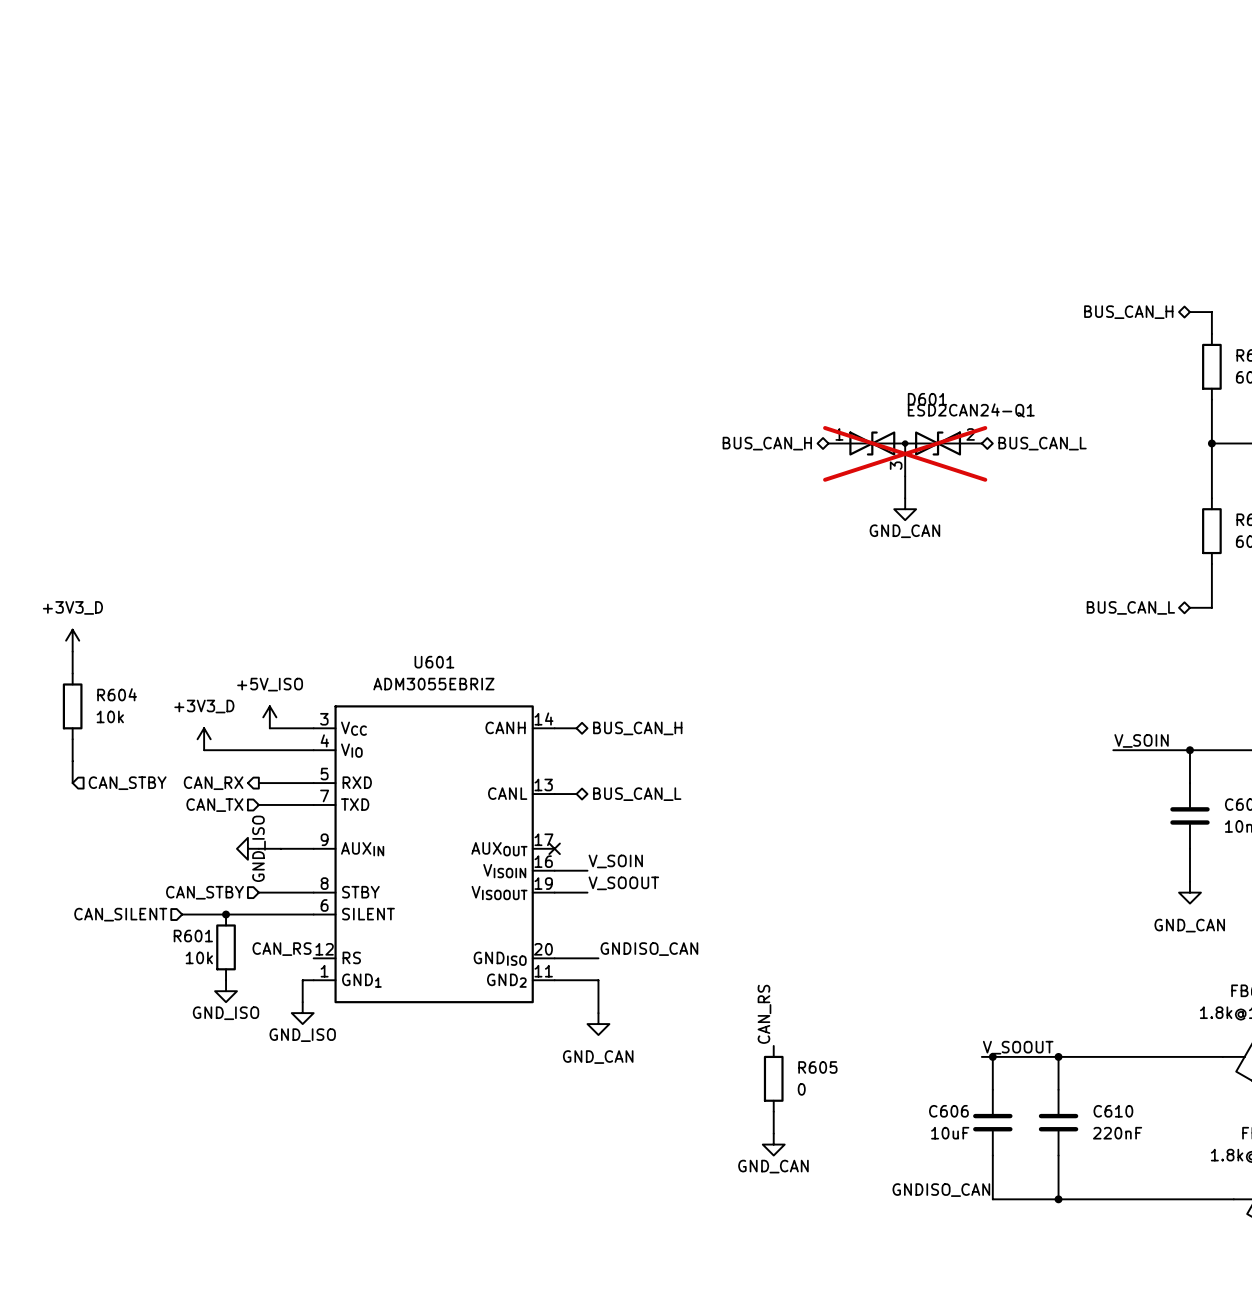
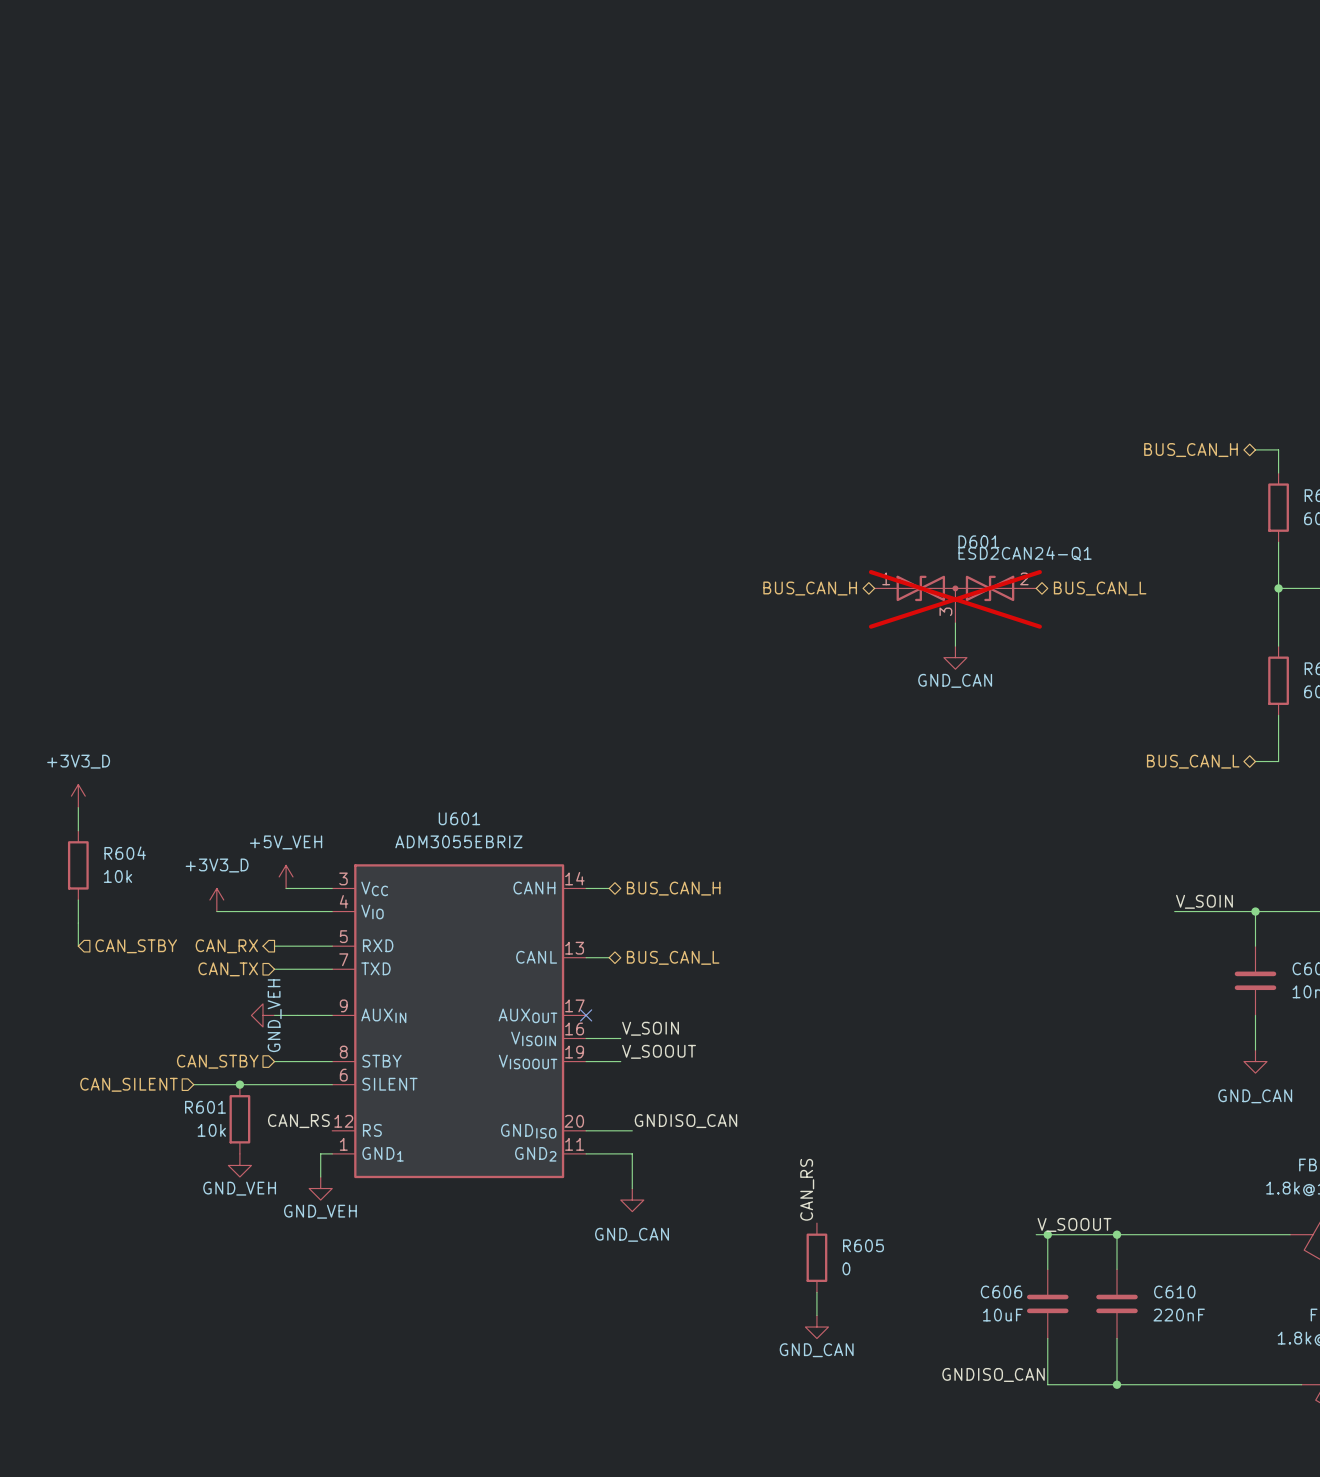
power symbol: +5V_ISO (269, 717) -> +5V_VEH (286, 876)
power symbol: GND_ISO (247, 848) -> GND_VEH (262, 1015)
power symbol: GND_ISO (226, 991) -> GND_VEH (239, 1165)
power symbol: GND_ISO (302, 1013) -> GND_VEH (320, 1188)

